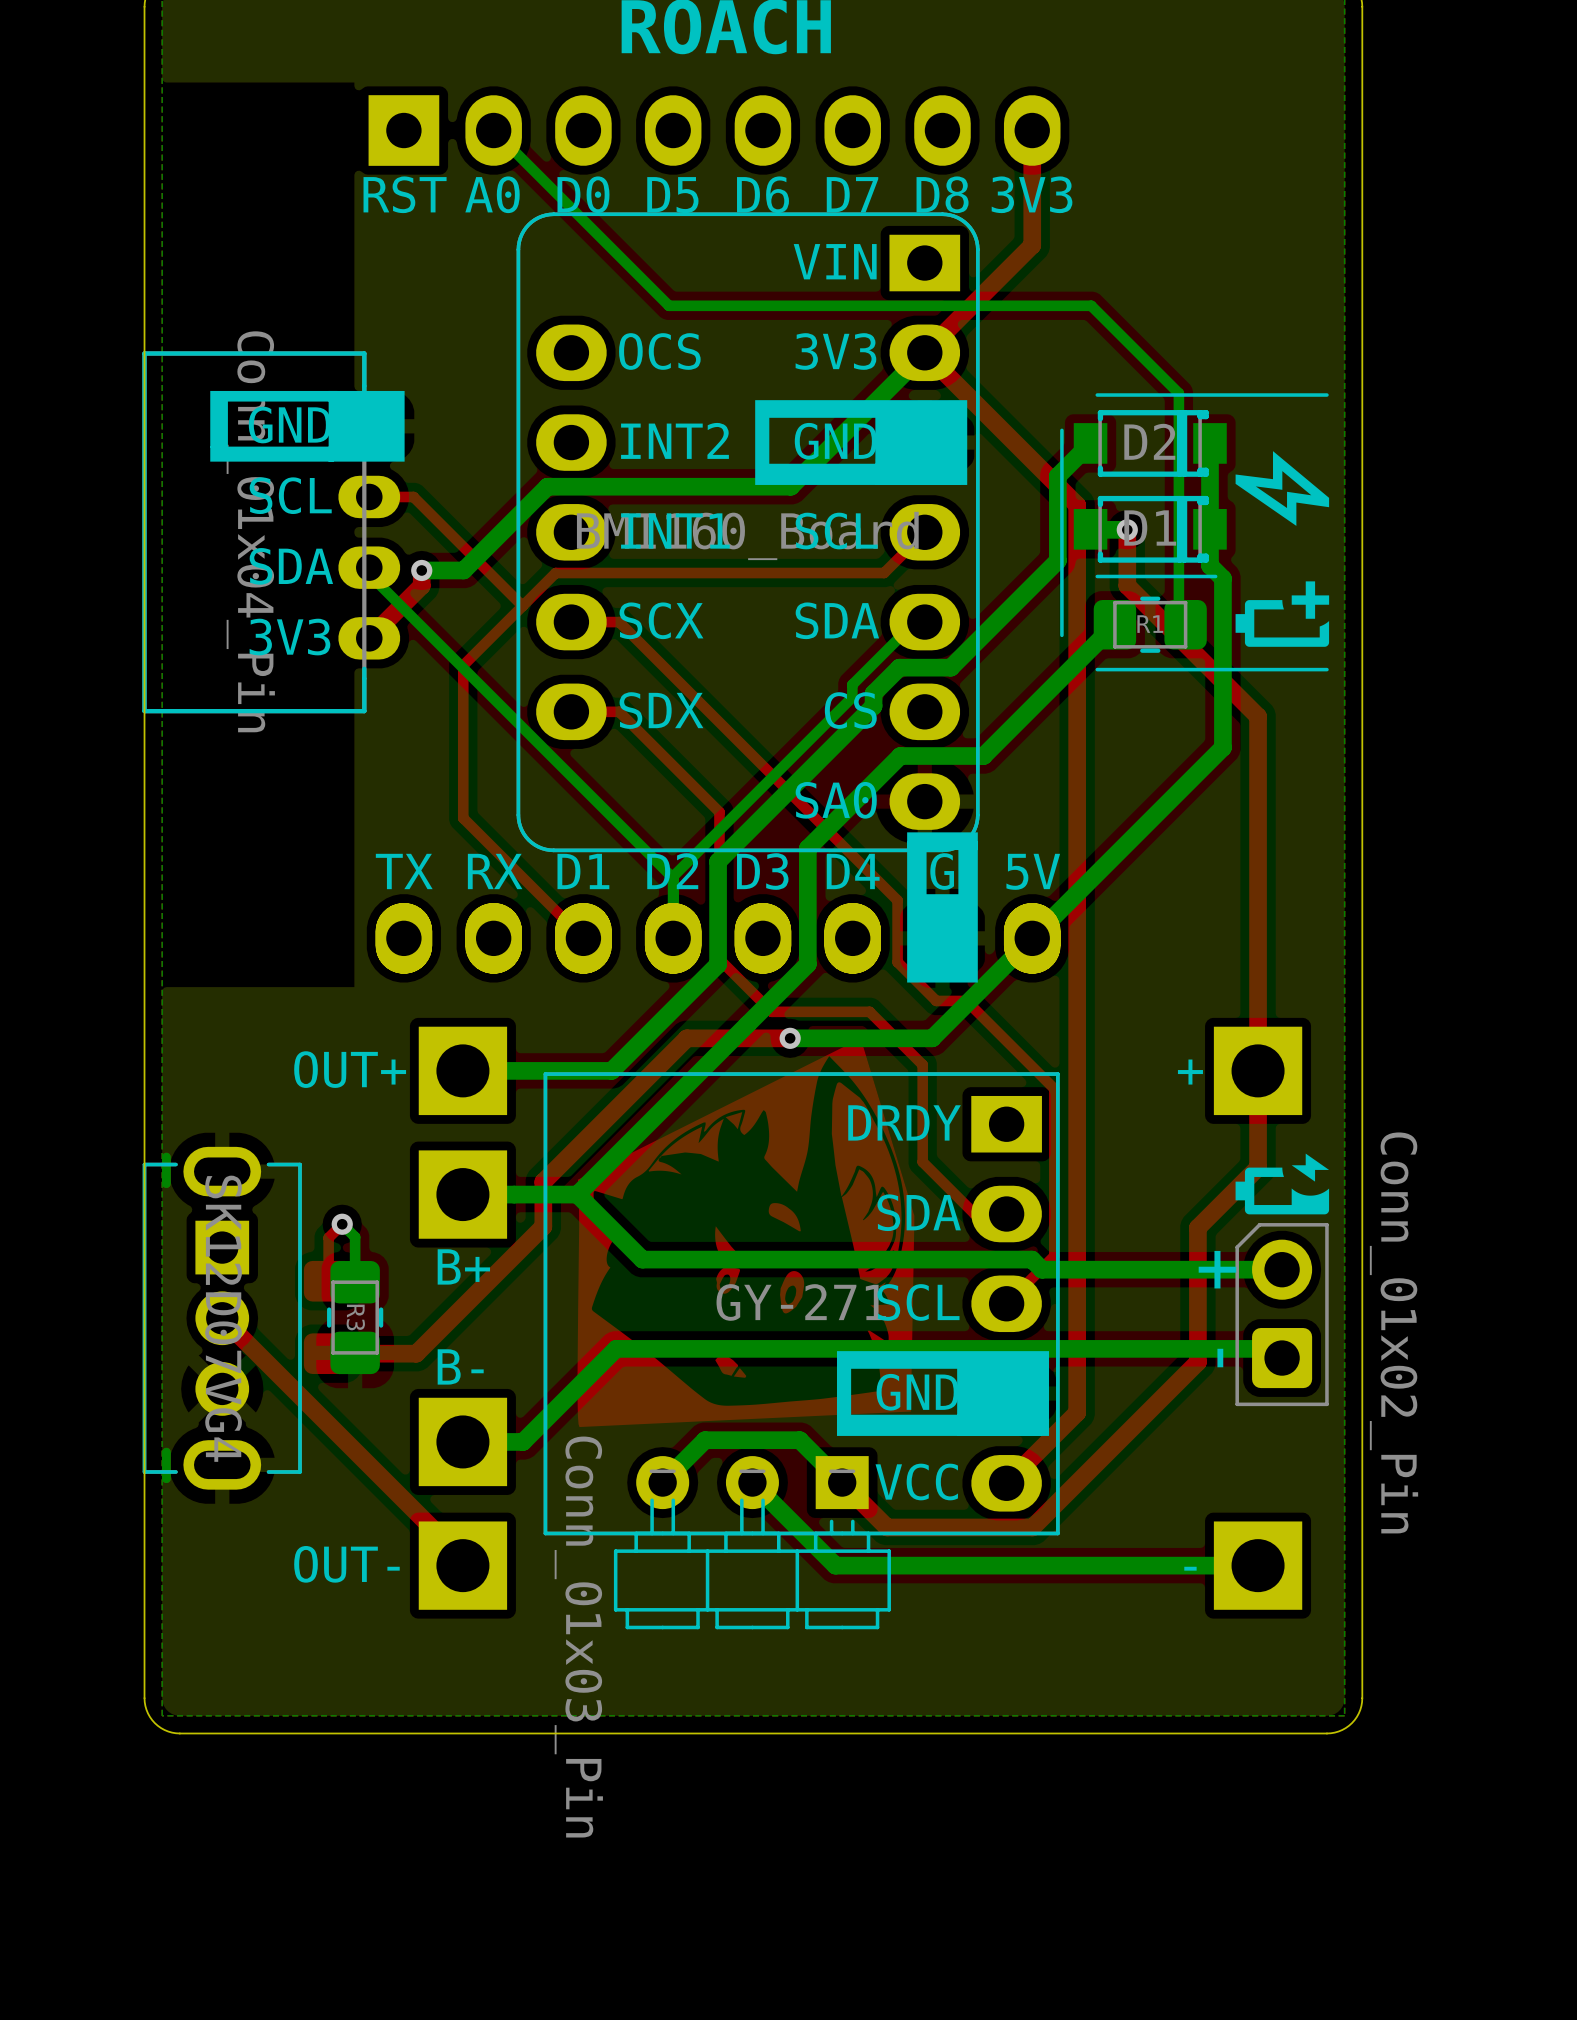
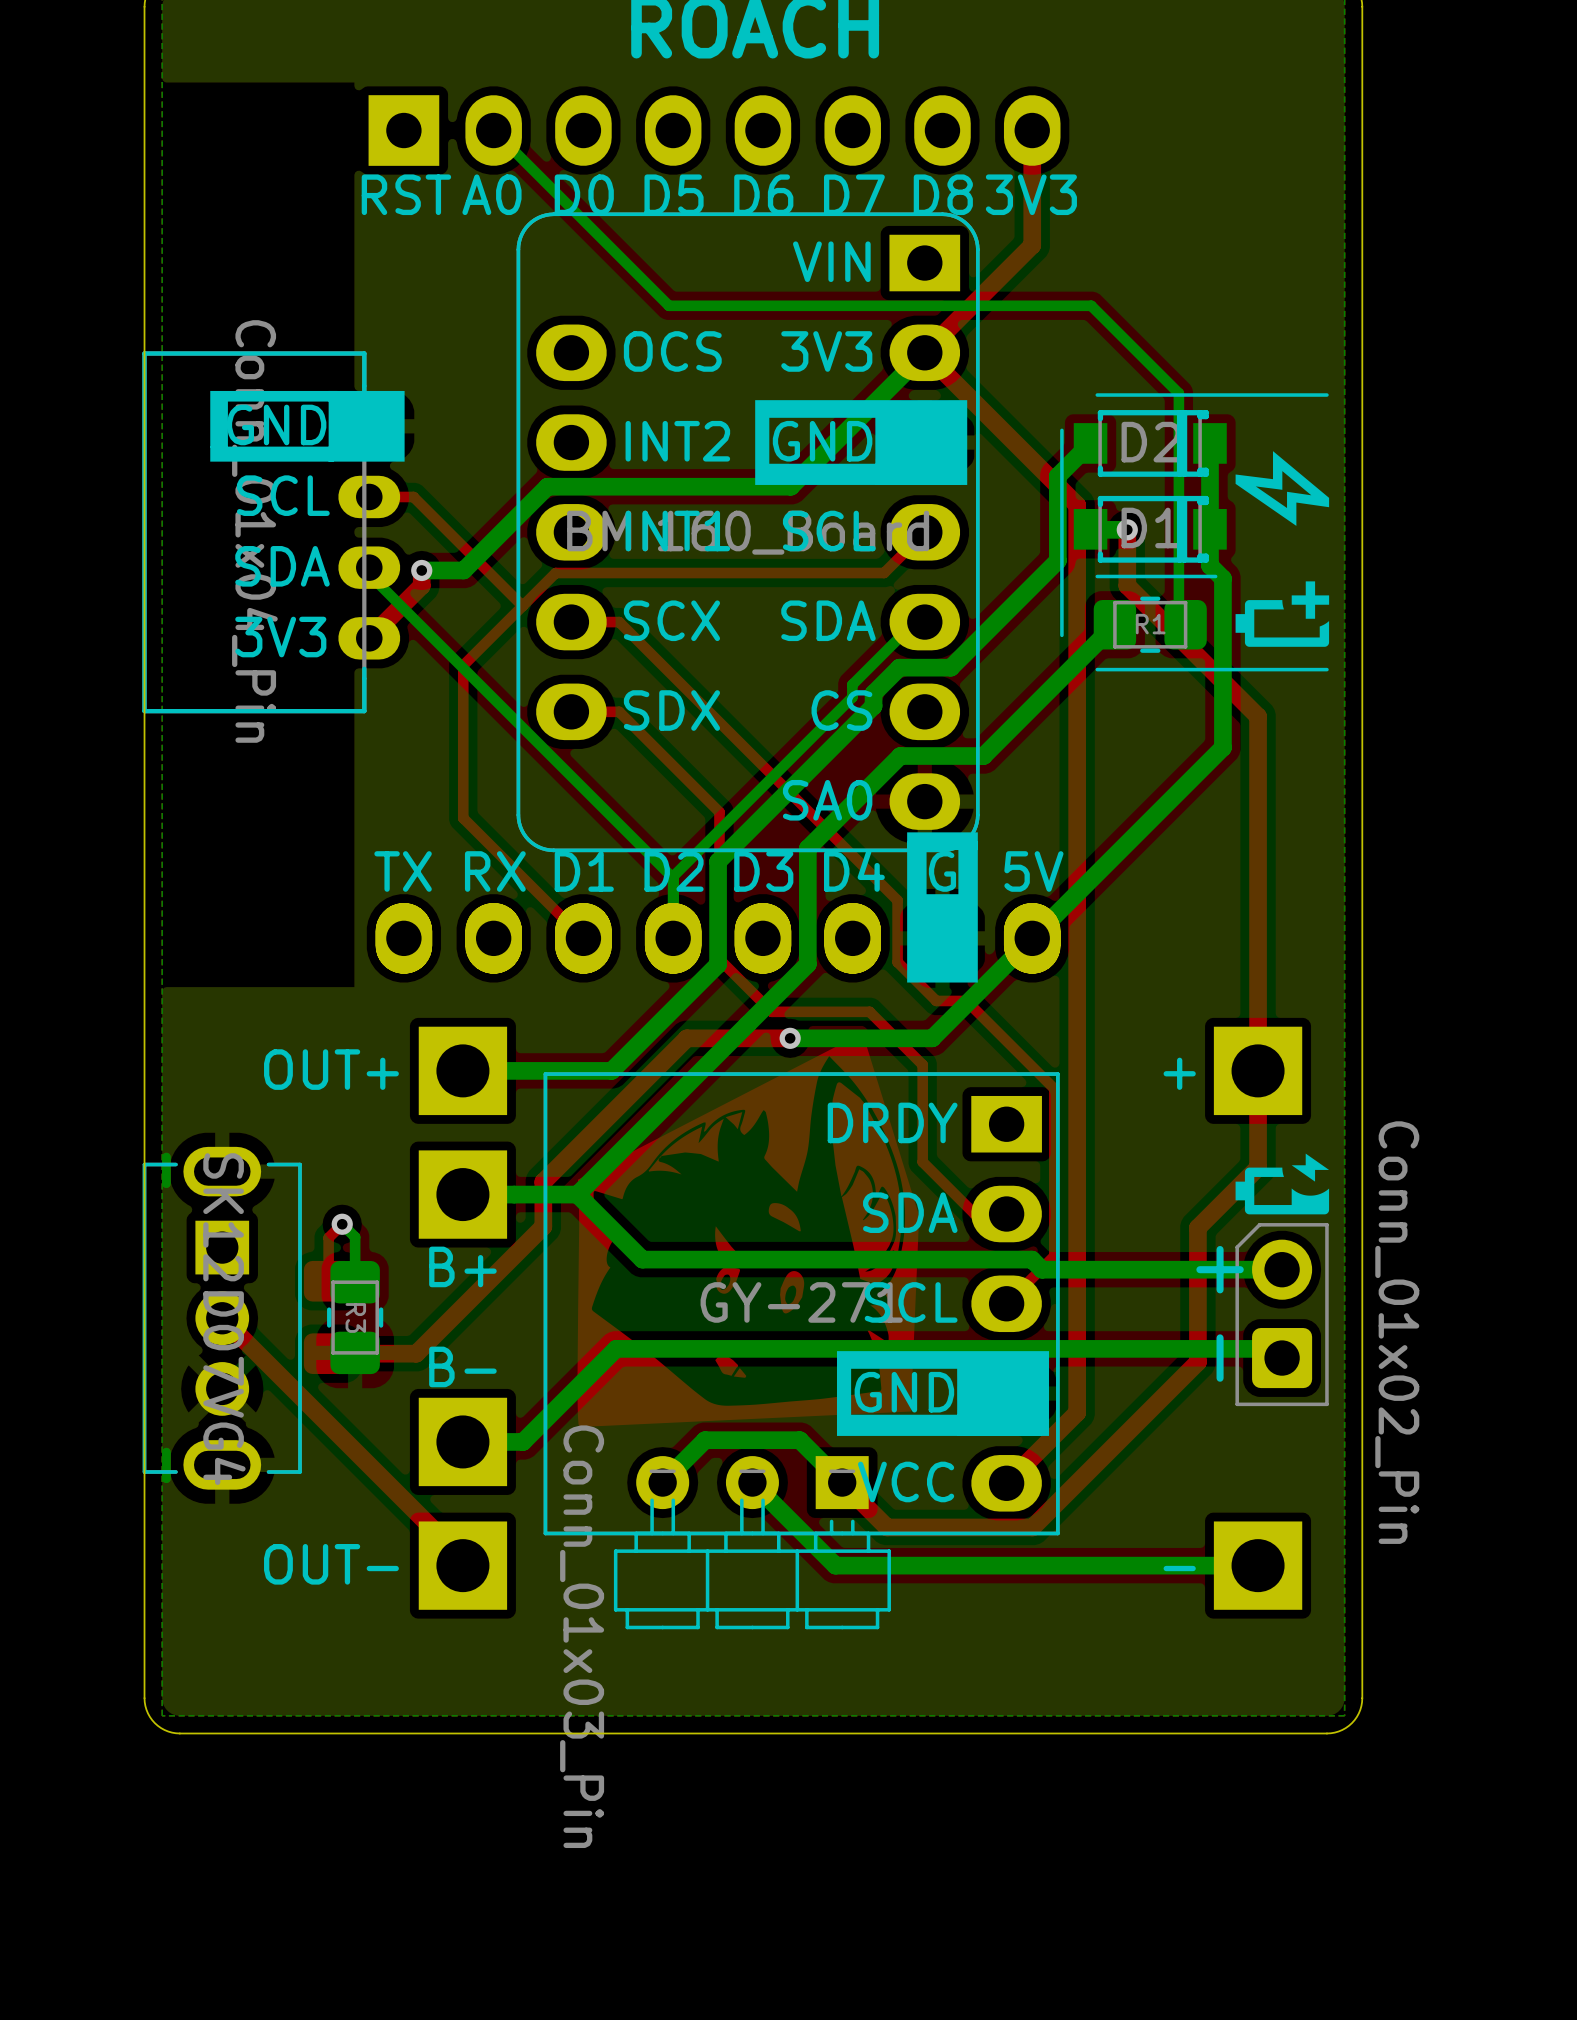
drawing shape: [577, 1038, 915, 1428] -> [577, 1033, 920, 1428]

